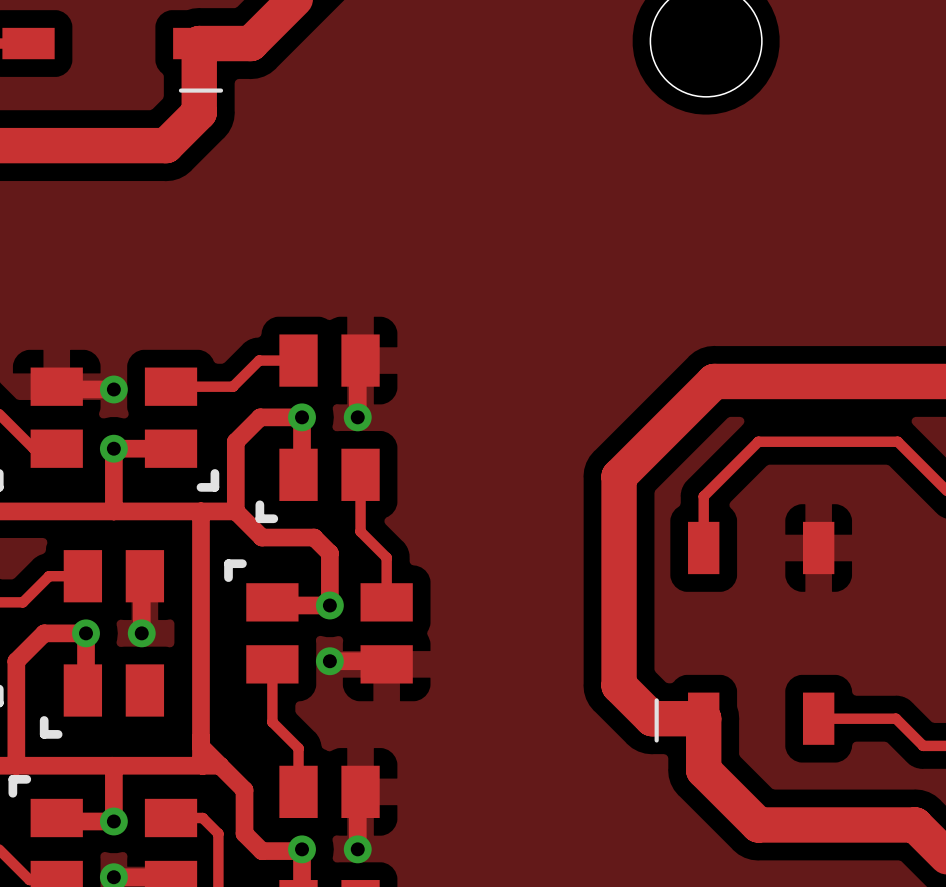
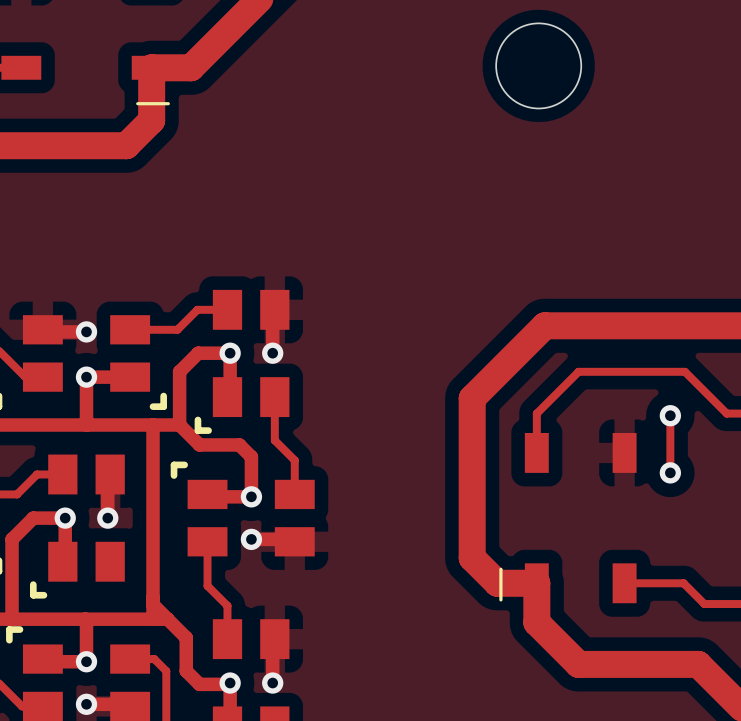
track: none -> (670, 415) (670, 472)
via: none -> (670, 415)
via: none -> (670, 472)

